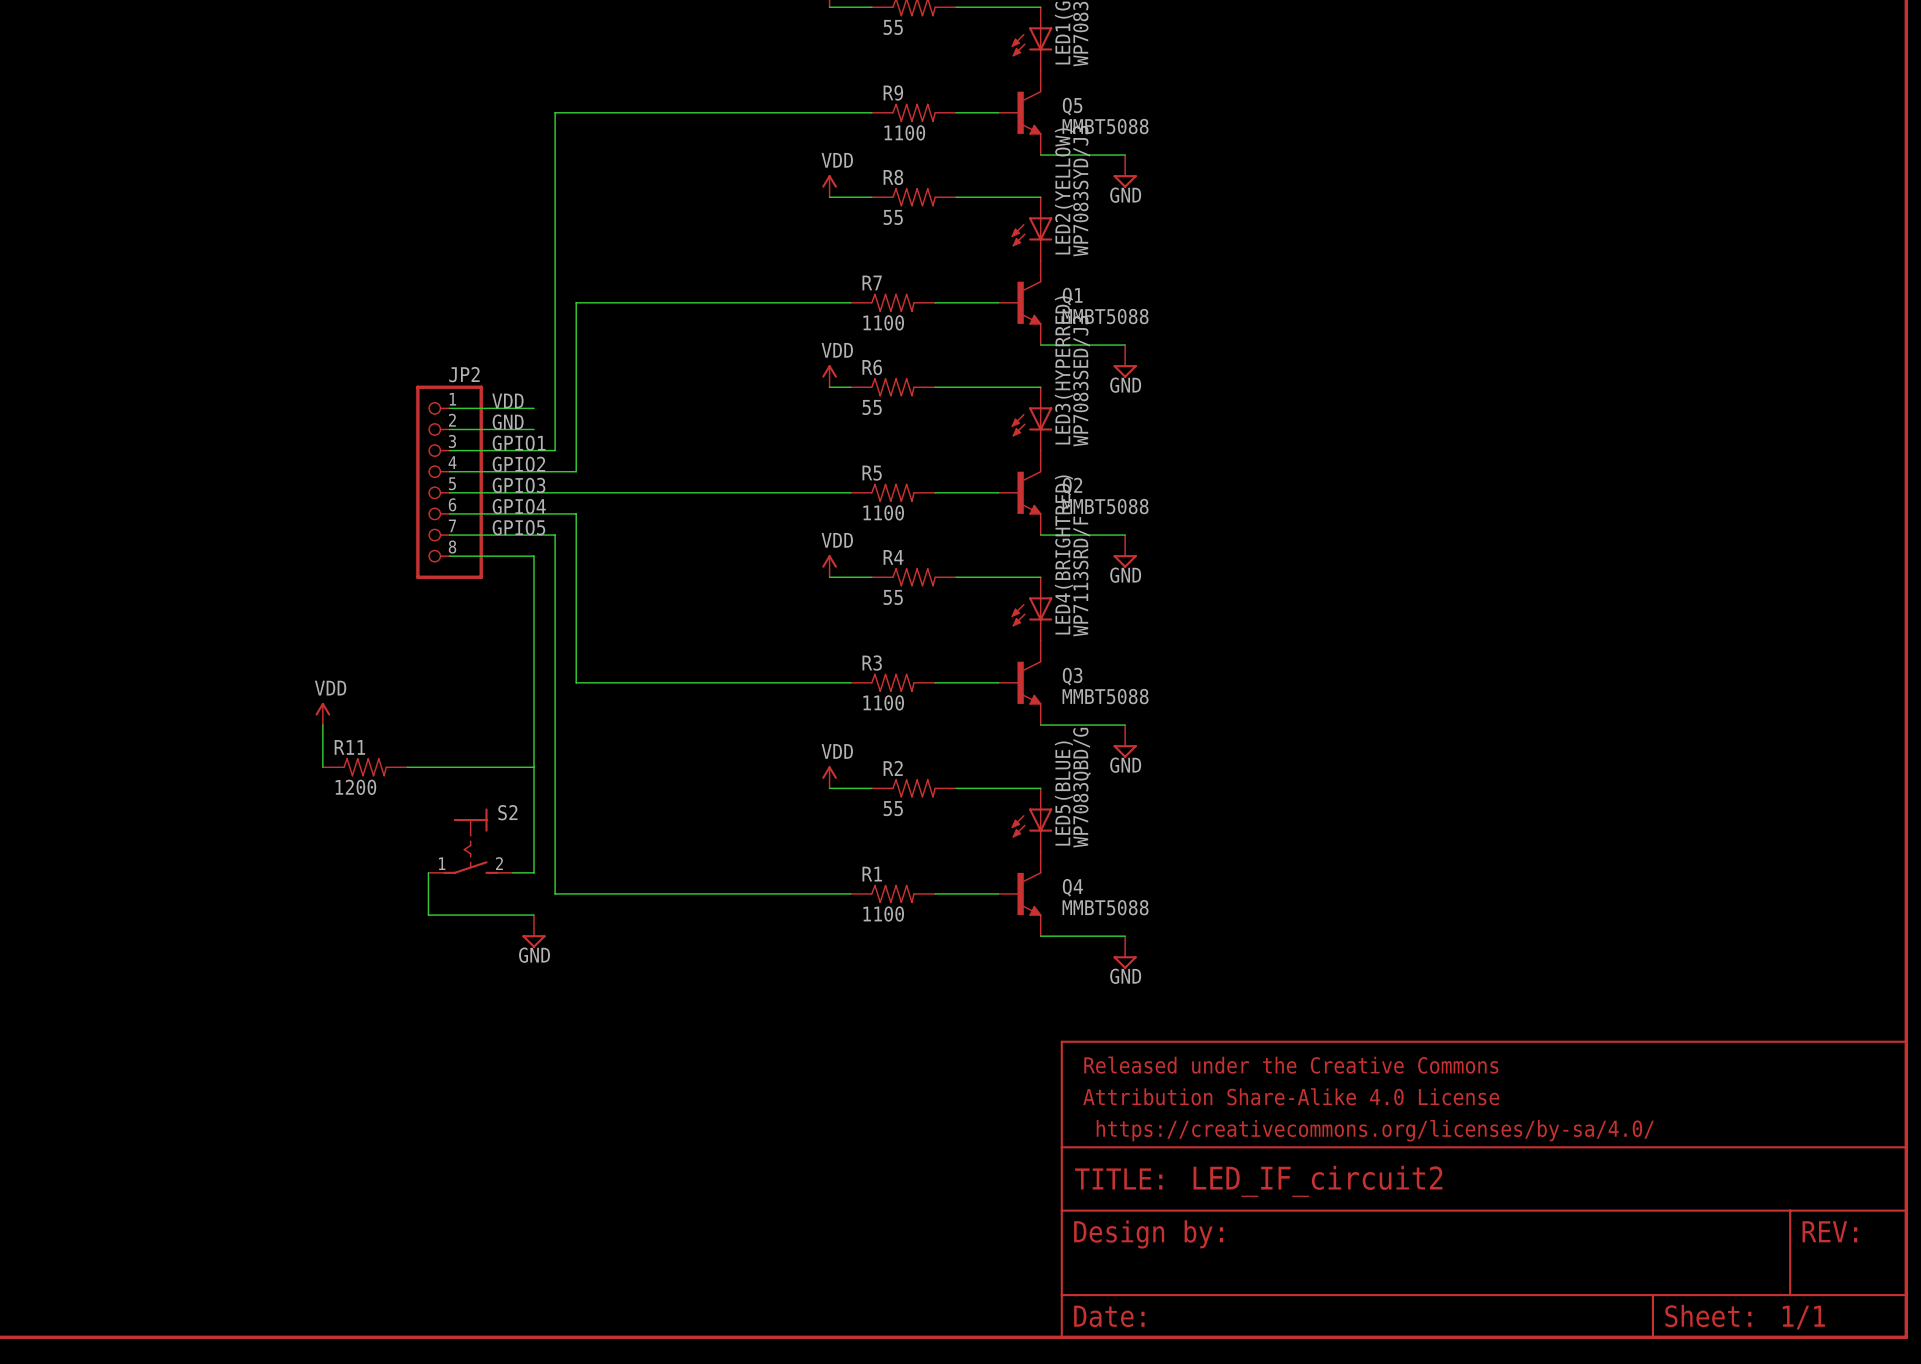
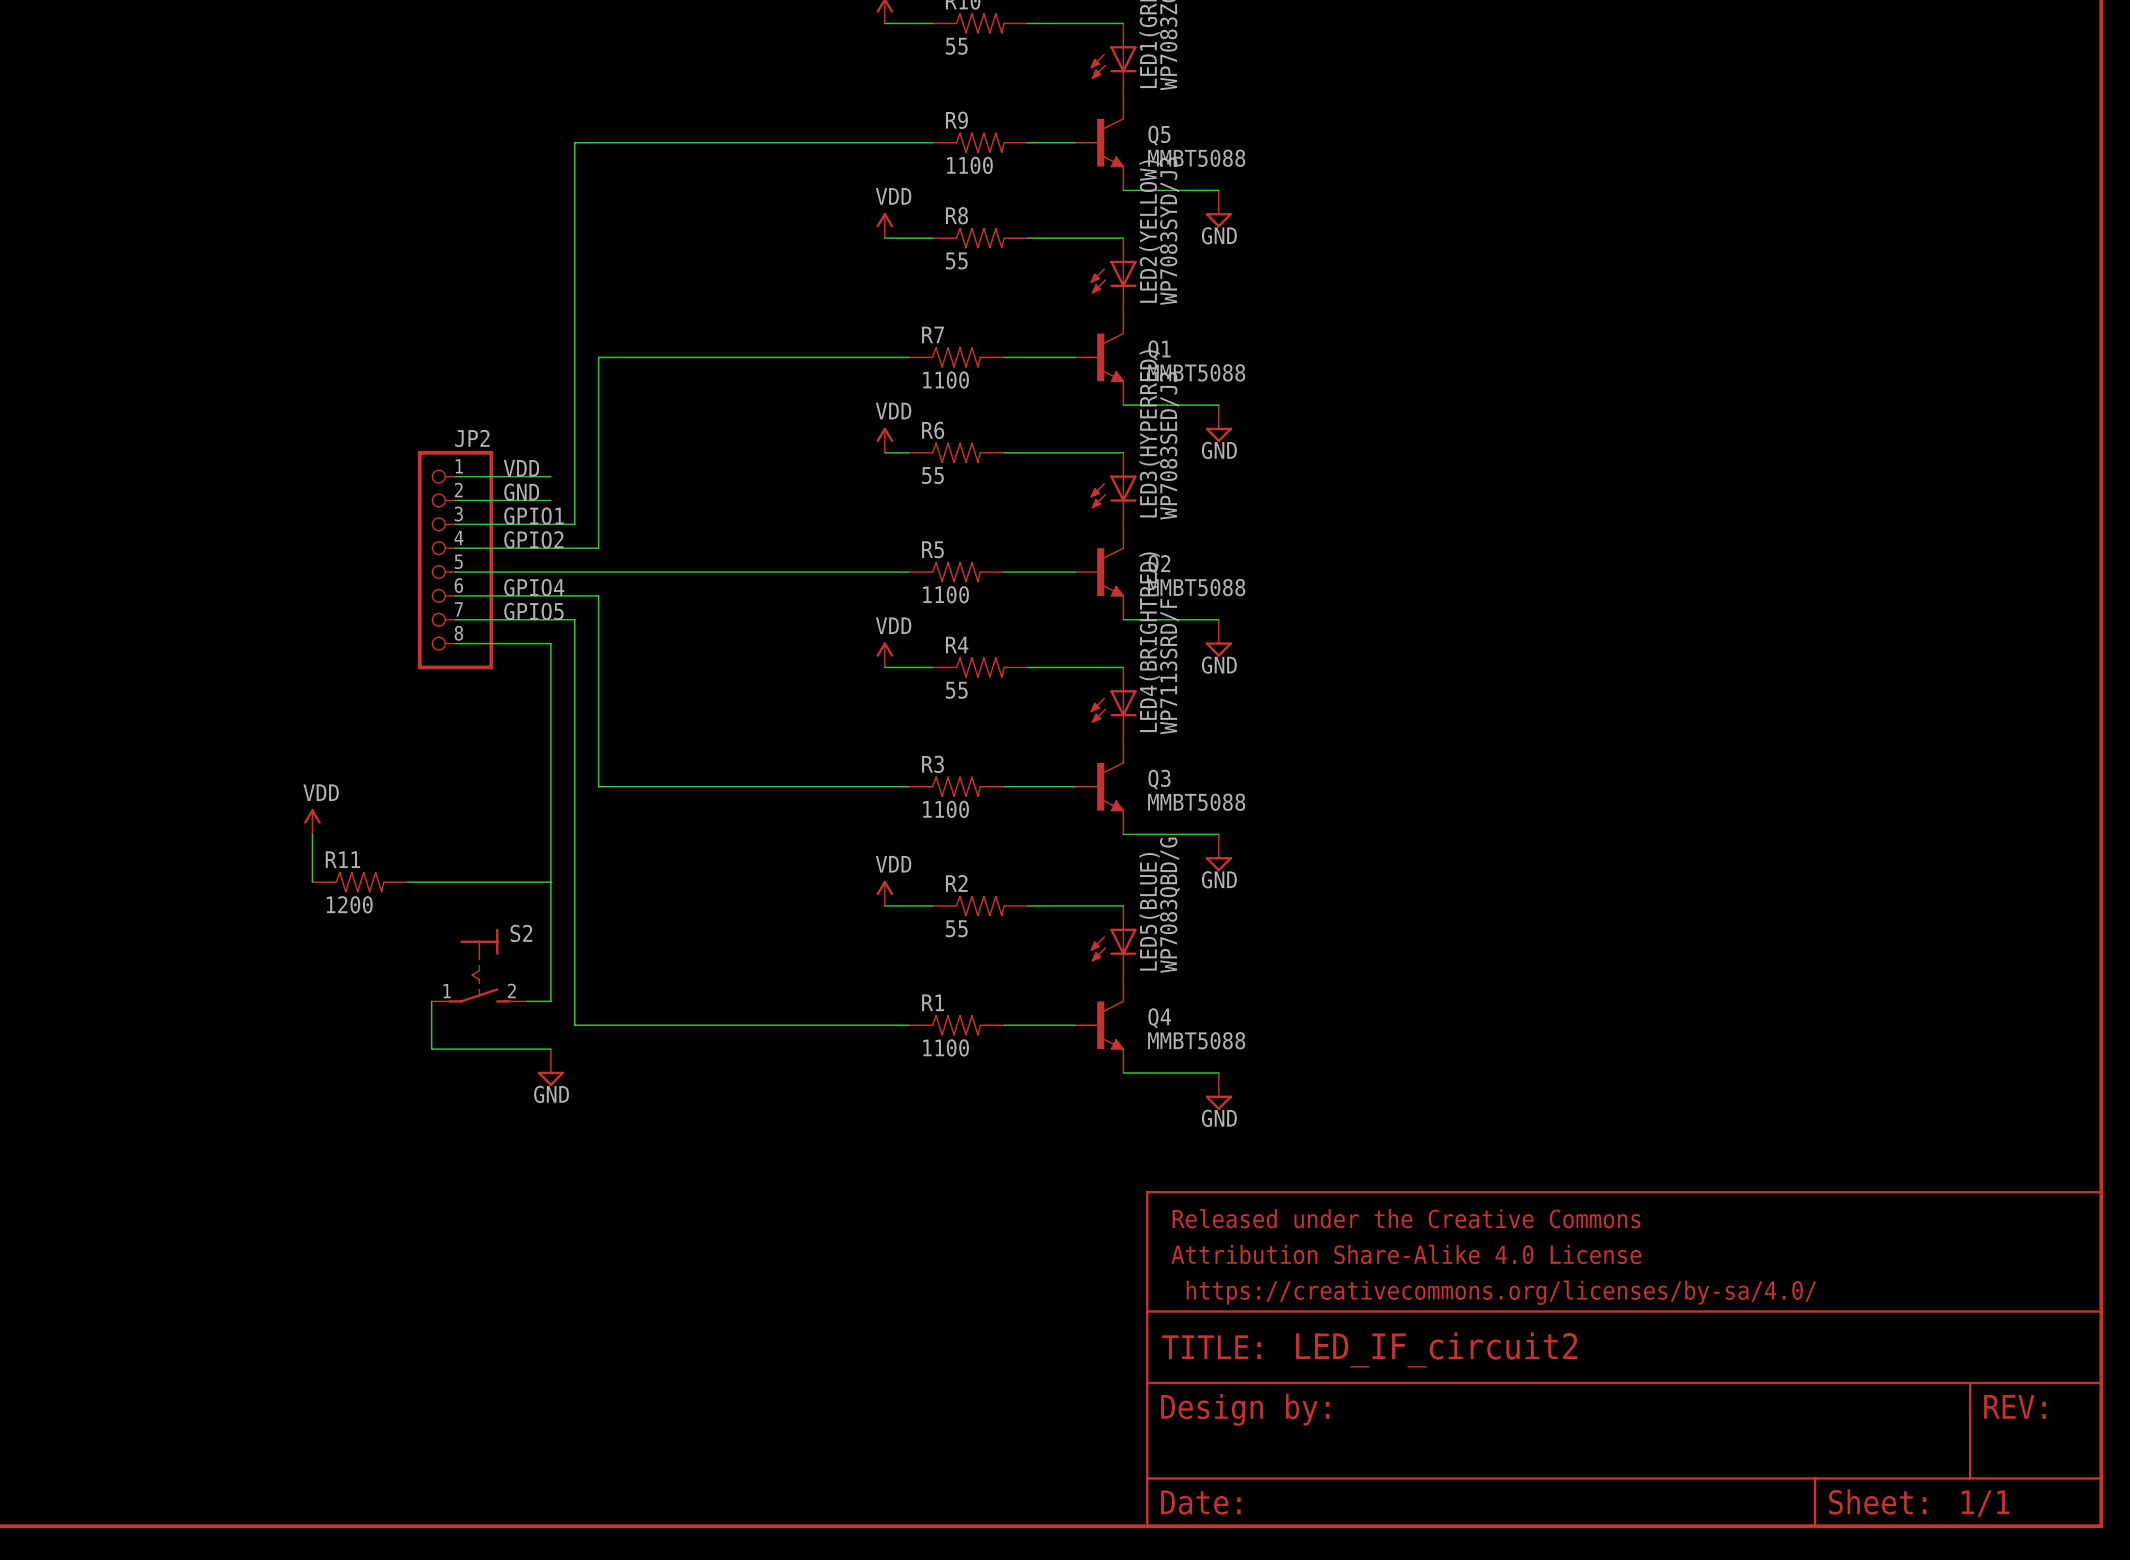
label: GPIO3 (519, 485) -> none

